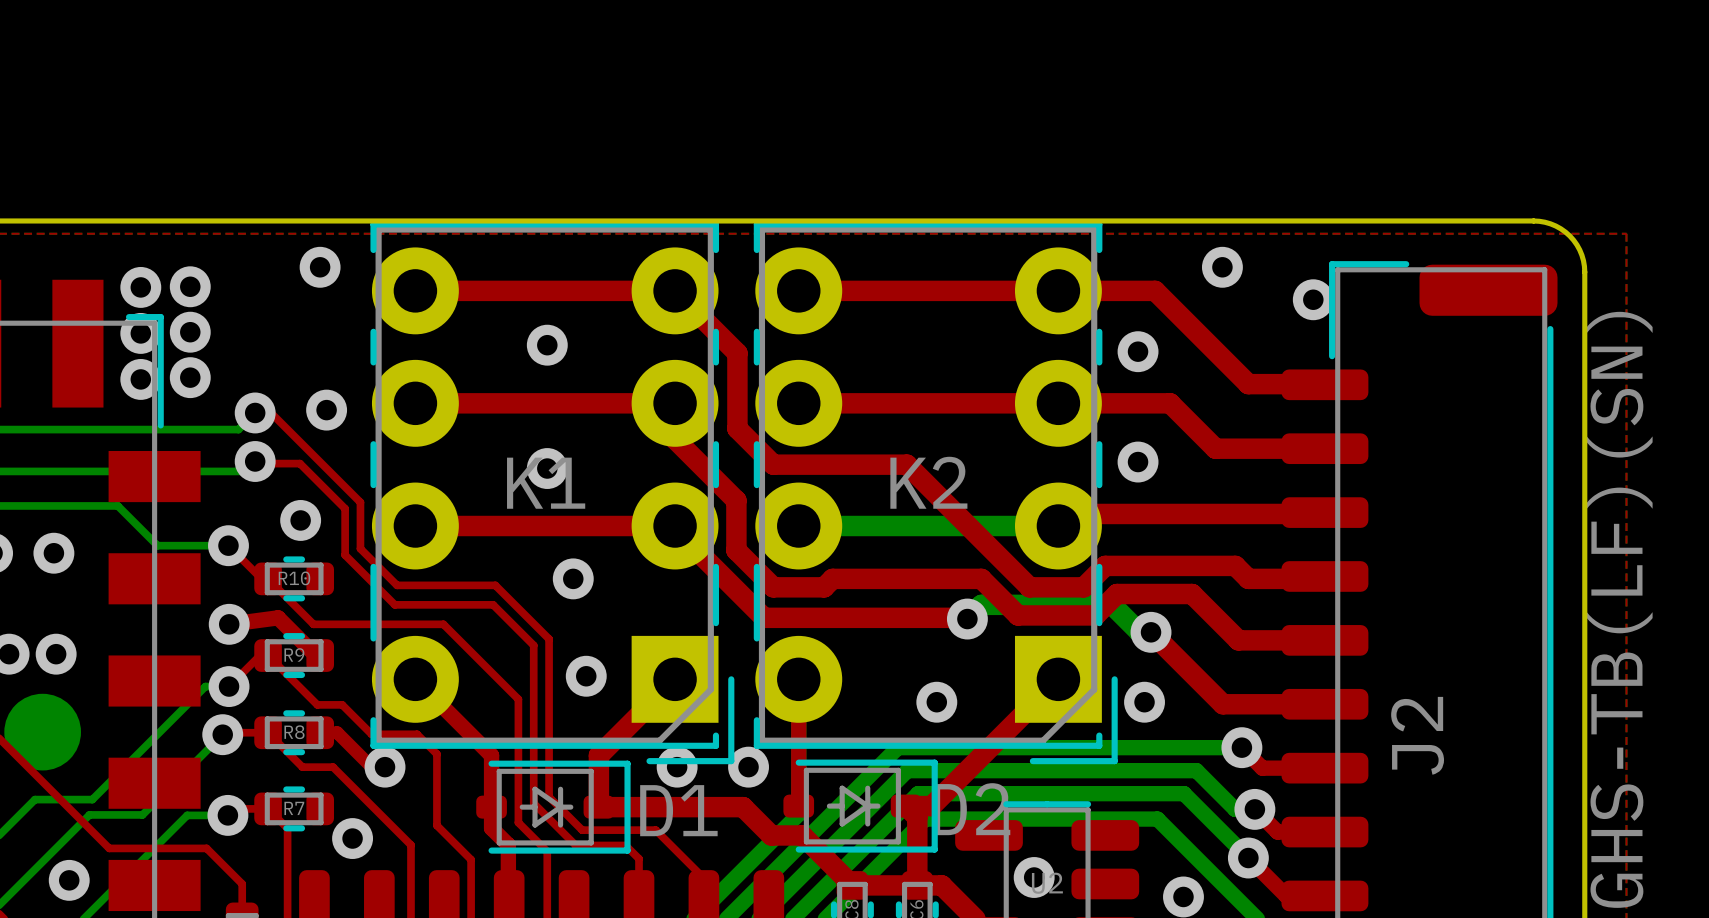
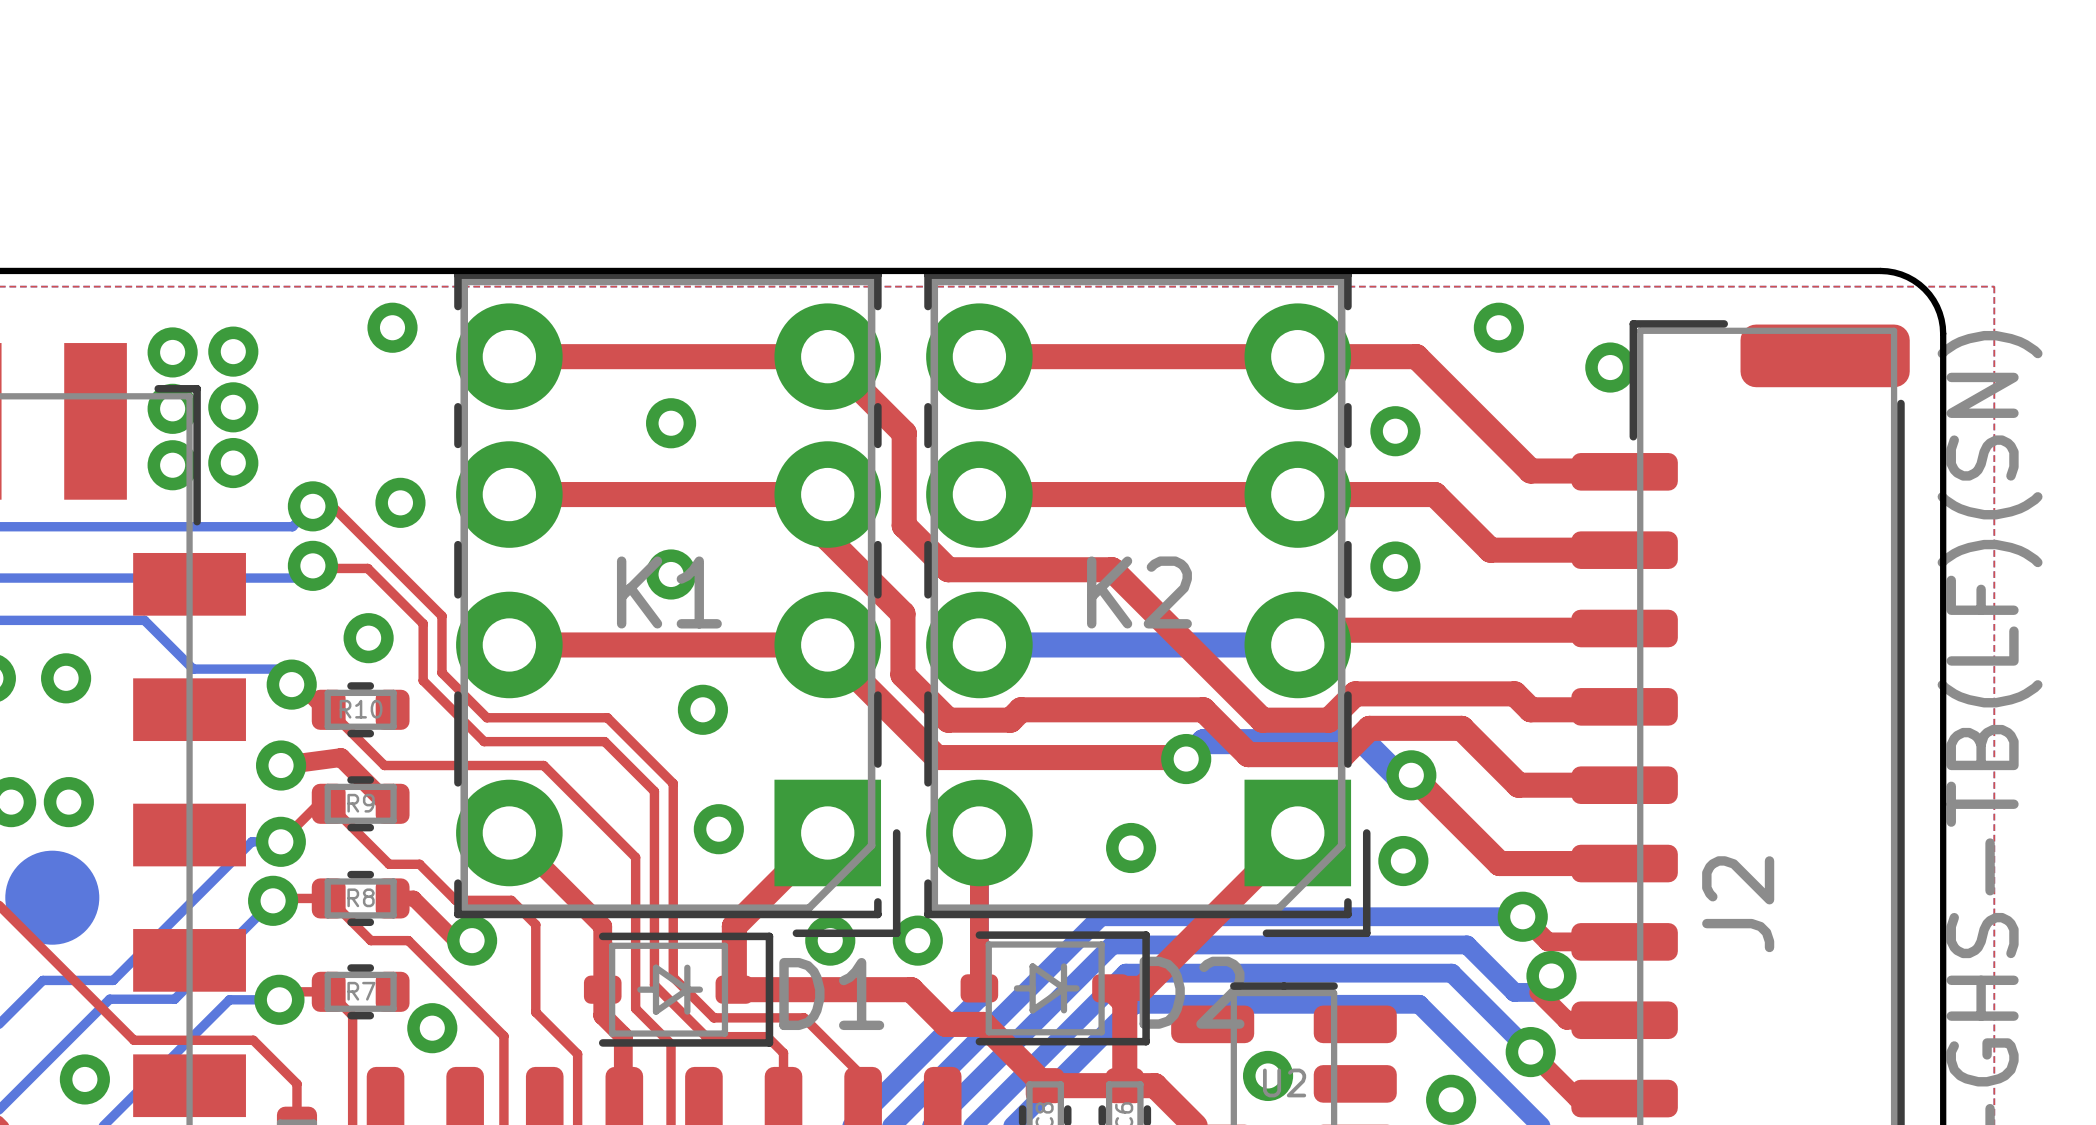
via position: (228, 545) -> (291, 684)
via position: (936, 702) -> (1131, 847)
via position: (1254, 809) -> (1551, 976)

